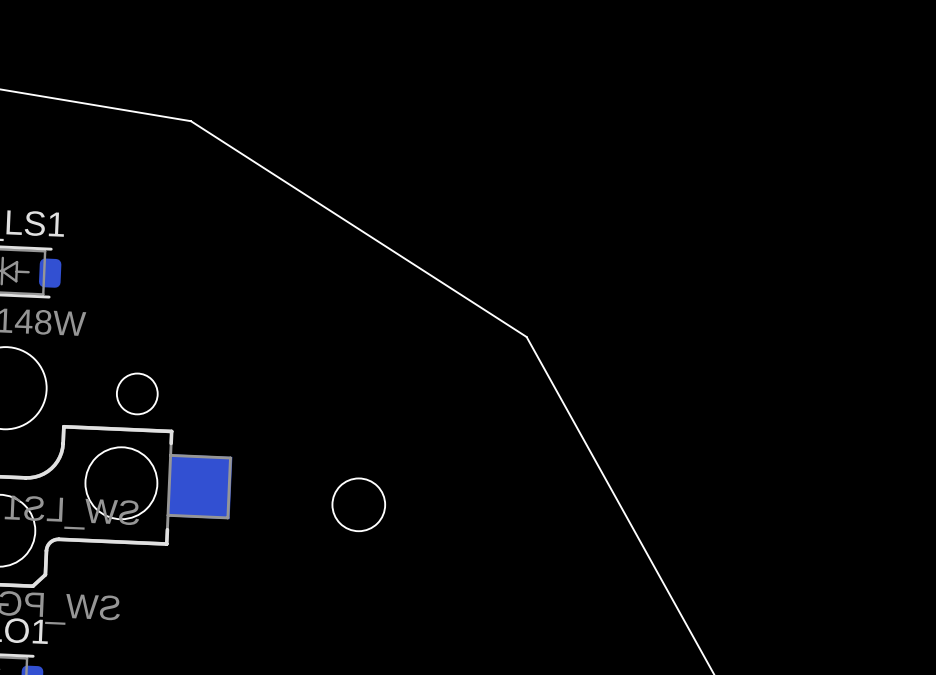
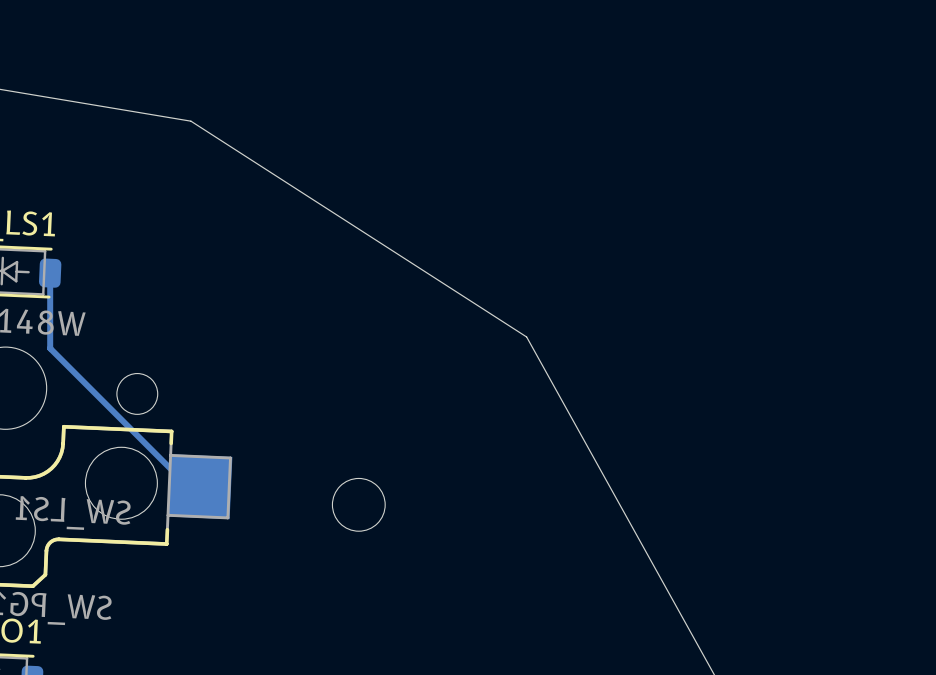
bottom track: none -> (50, 273) (50, 348) (188, 486) (199, 486)

